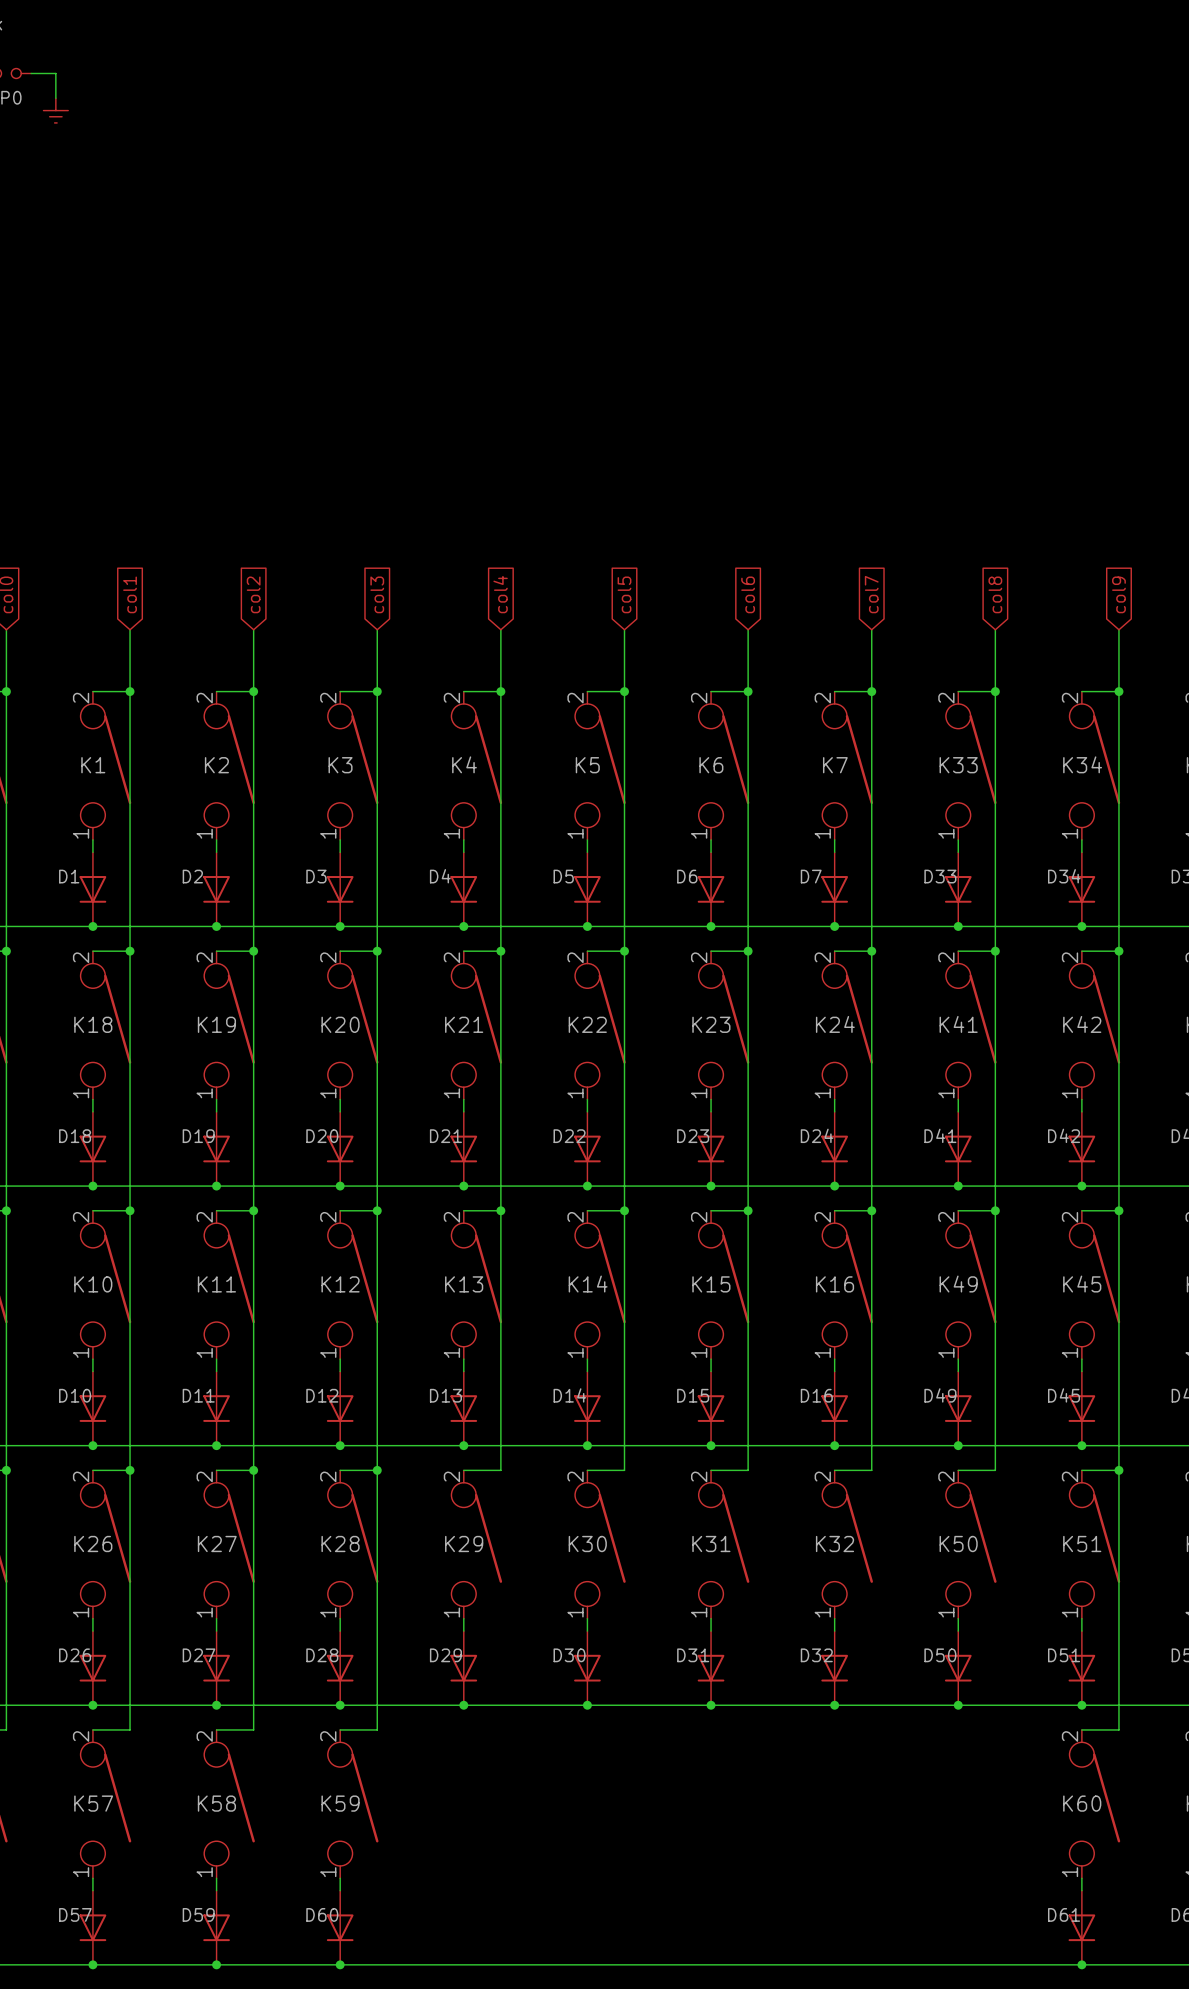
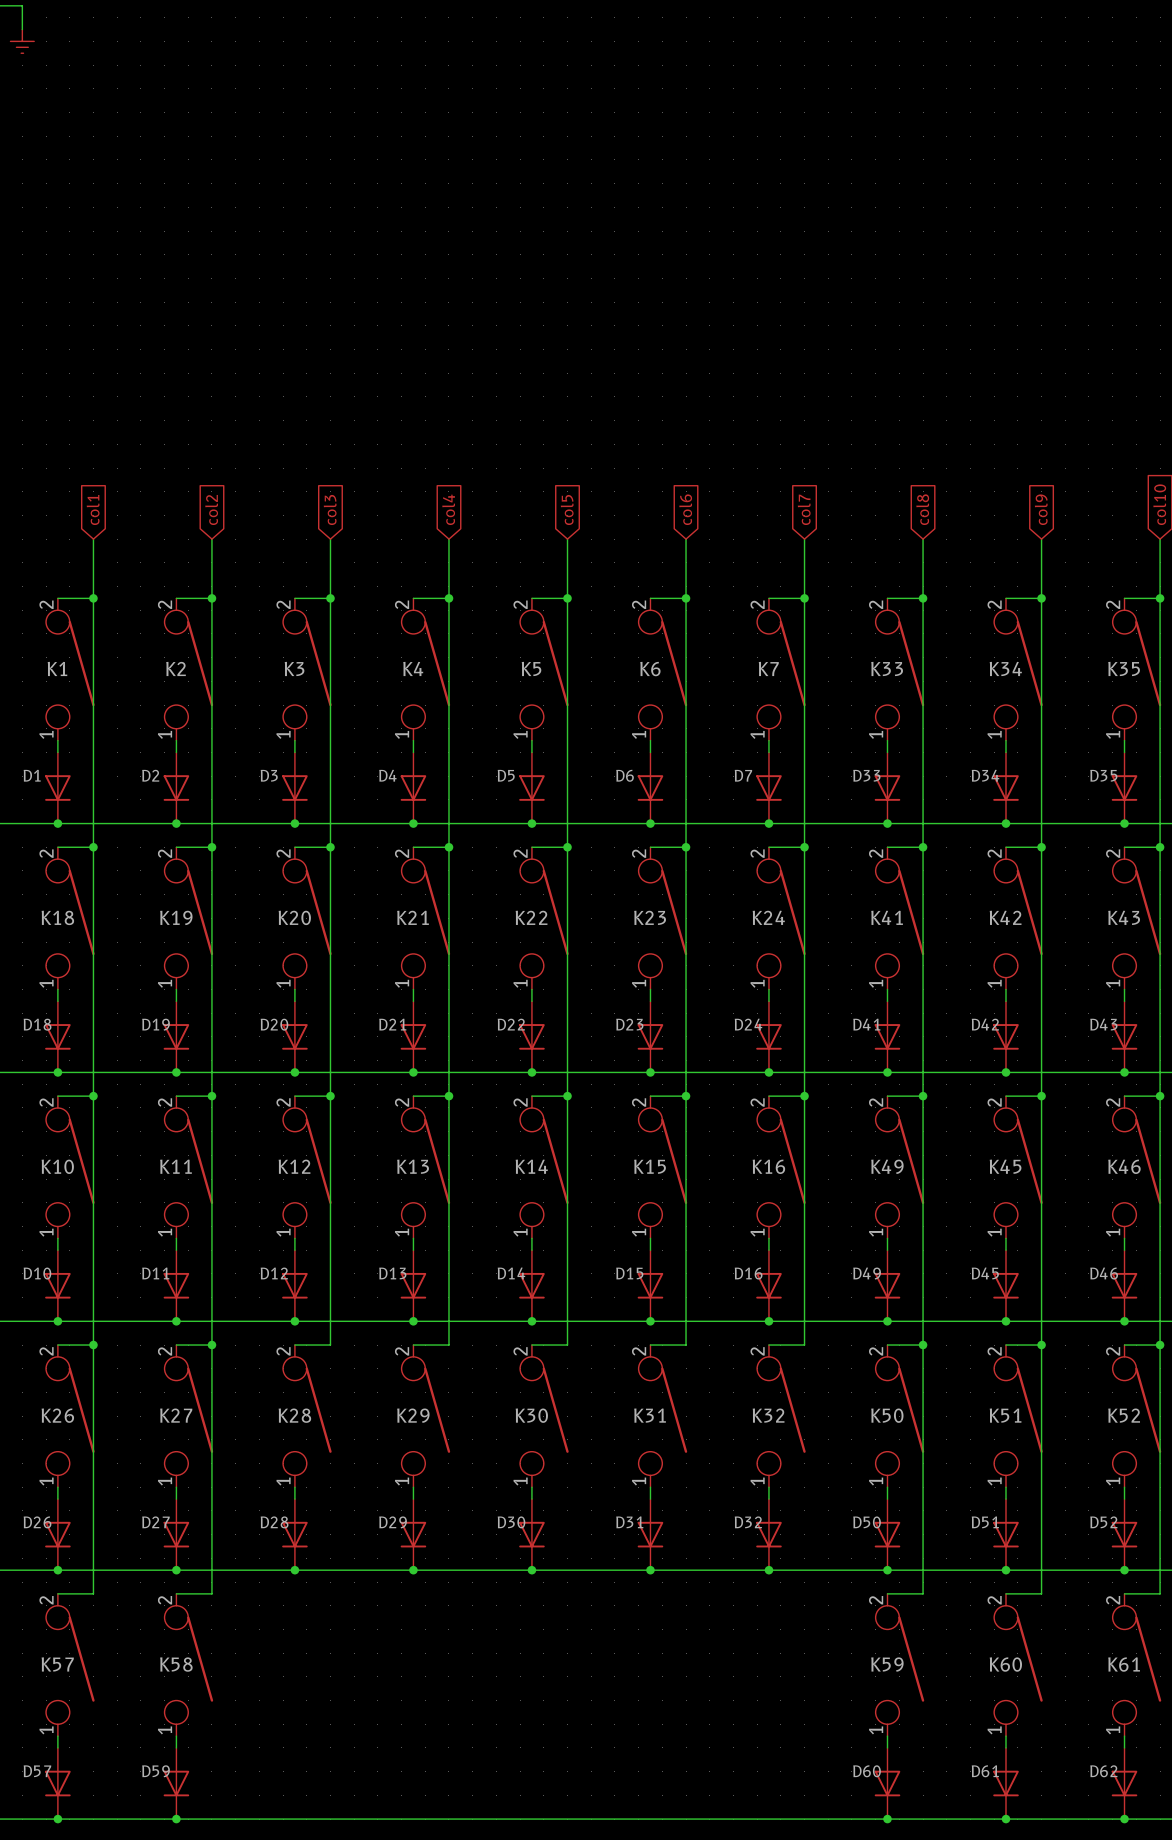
wire: (377, 1470) (377, 1729) (340, 1729) -> none
junction: (377, 1470) -> none
wire: none -> (923, 1345) (923, 1593) (887, 1593)
junction: none -> (923, 1345)
K59 position: (353, 1804) -> (899, 1665)
wire: (340, 1878) (340, 1890) -> none
wire: none -> (887, 1736) (887, 1747)
D60 position: (340, 1927) -> (887, 1783)
junction: (340, 1964) -> none
junction: none -> (887, 1819)

